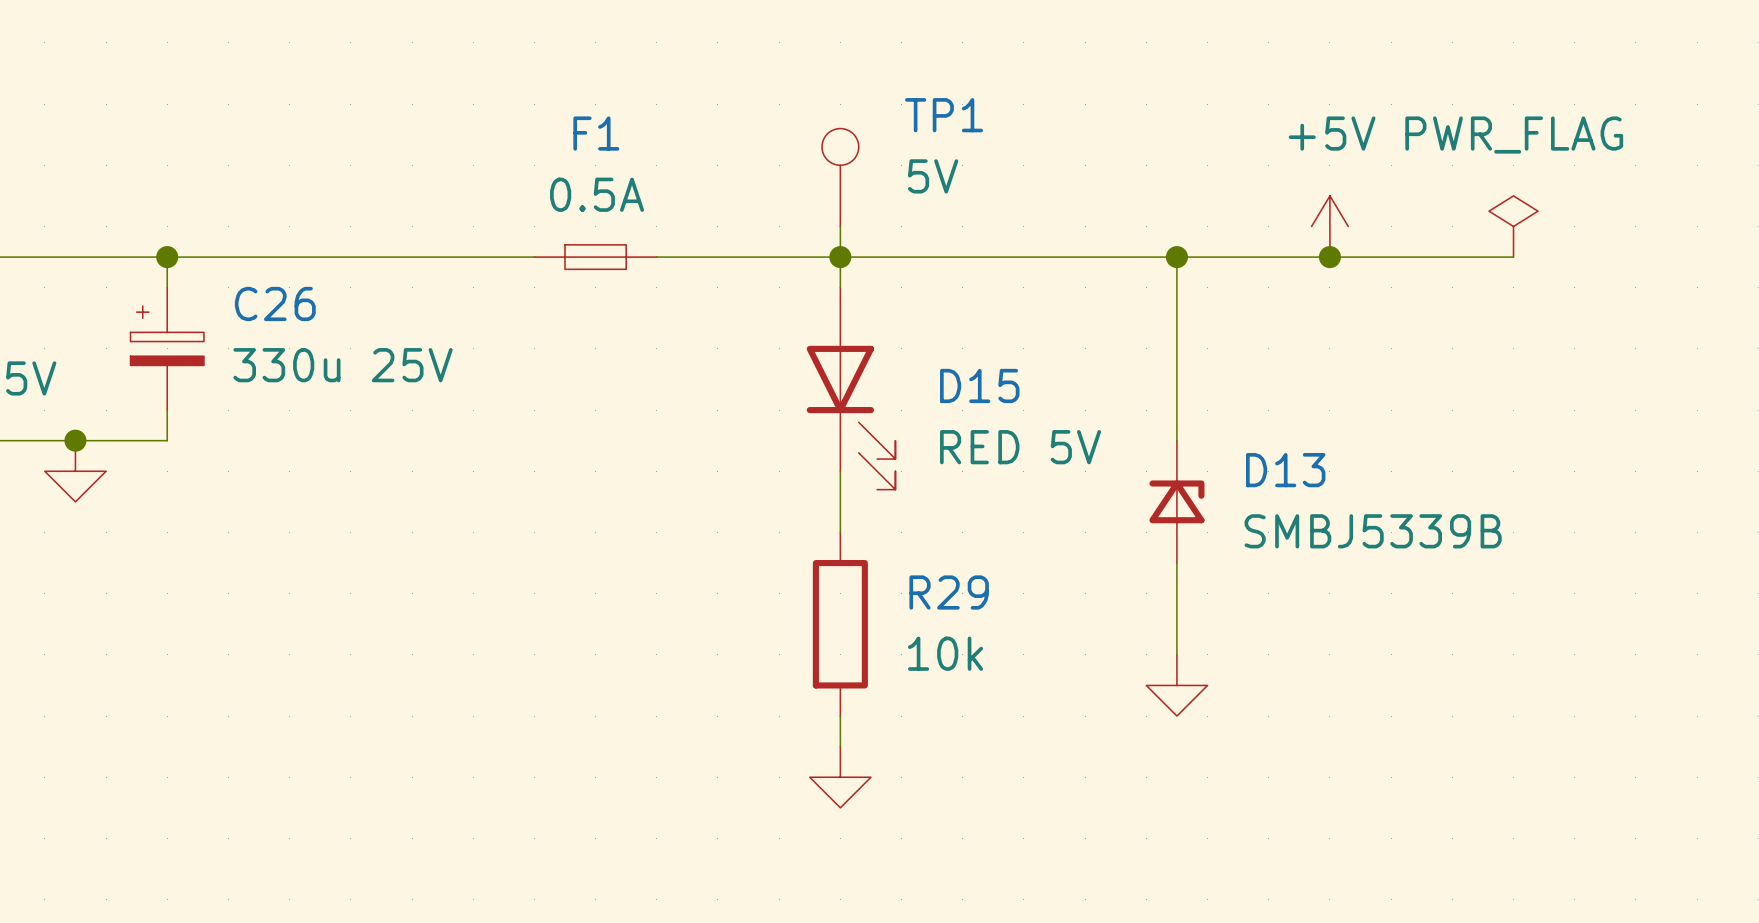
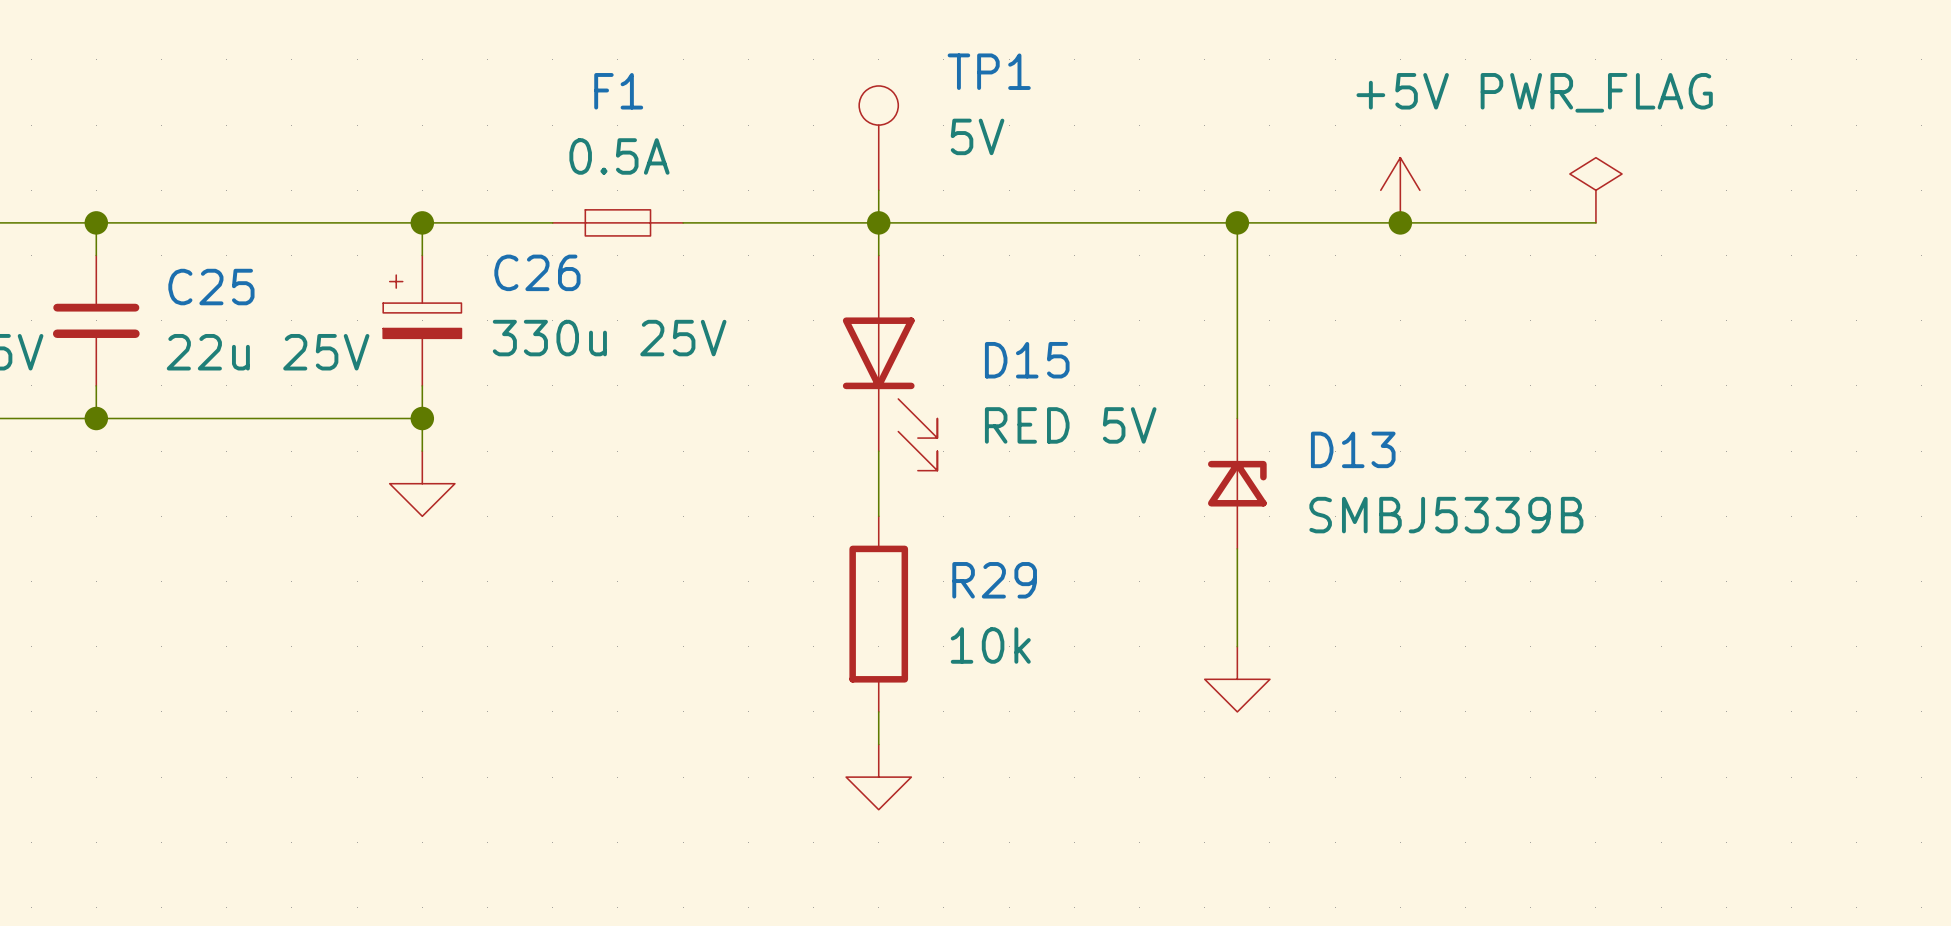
wire: (167, 257) (167, 287) -> (96, 222) (96, 255)
junction position: (167, 257) -> (96, 222)
wire: none -> (422, 222) (422, 255)
junction: none -> (422, 222)
C25: none -> 22u 25V (96, 320)
C26 position: (167, 348) -> (422, 320)
wire: none -> (96, 385) (96, 418)
wire: (167, 410) (167, 440) -> (422, 418) (161, 418)
wire: none -> (422, 385) (422, 451)
junction position: (75, 440) -> (96, 418)
junction: none -> (422, 418)
power symbol position: (75, 471) -> (422, 483)

